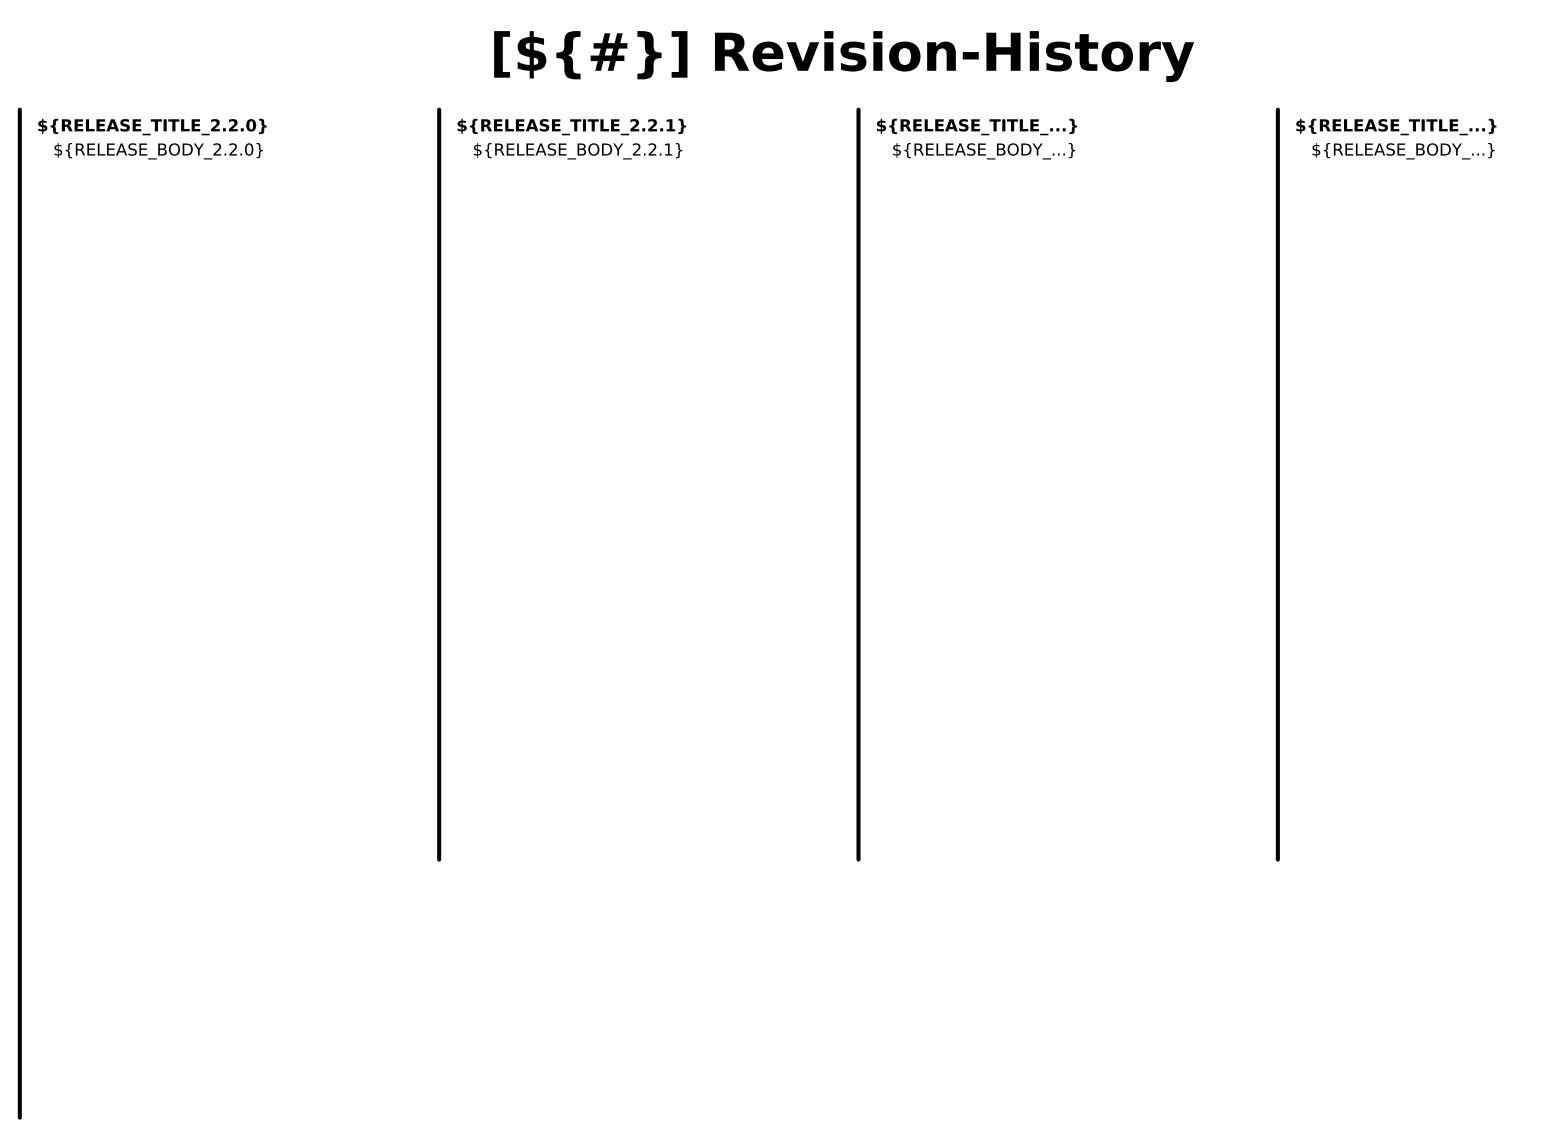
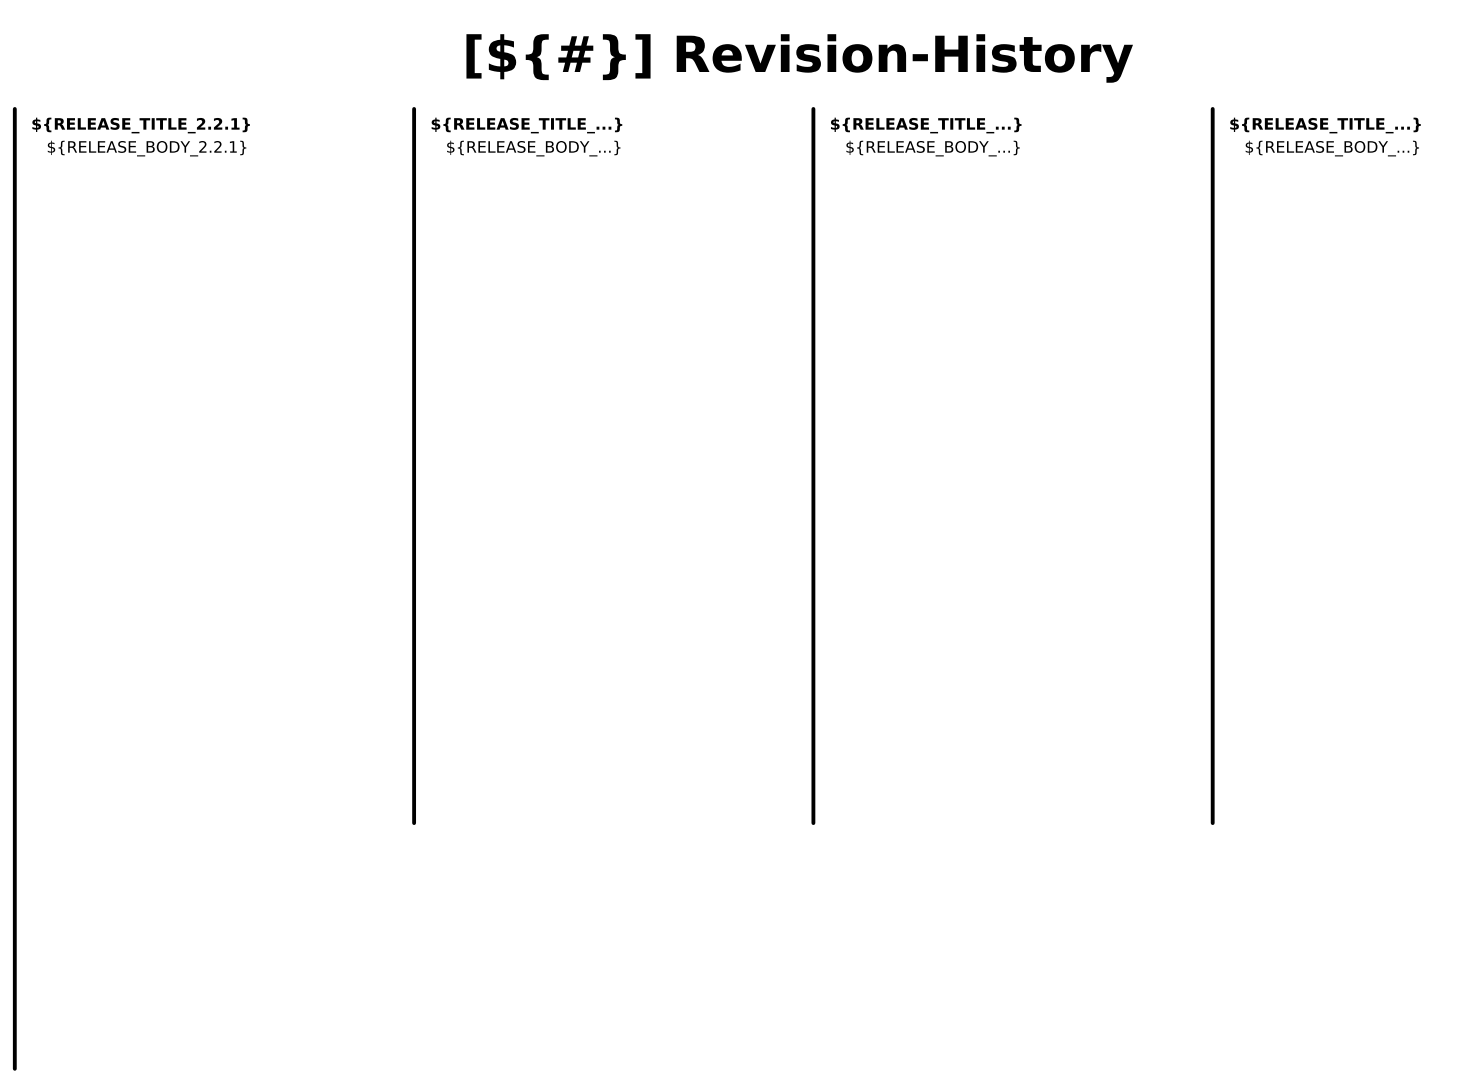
text: ${RELEASE_TITLE_2.2.0} (152, 127) -> ${RELEASE_TITLE_2.2.1} (141, 125)
text: ${RELEASE_TITLE_2.2.1} (571, 127) -> ${RELEASE_TITLE_...} (526, 125)
text: ${RELEASE_BODY_2.2.0} (158, 151) -> ${RELEASE_BODY_2.2.1} (147, 148)
text: ${RELEASE_BODY_2.2.1} (578, 151) -> ${RELEASE_BODY_...} (533, 148)

